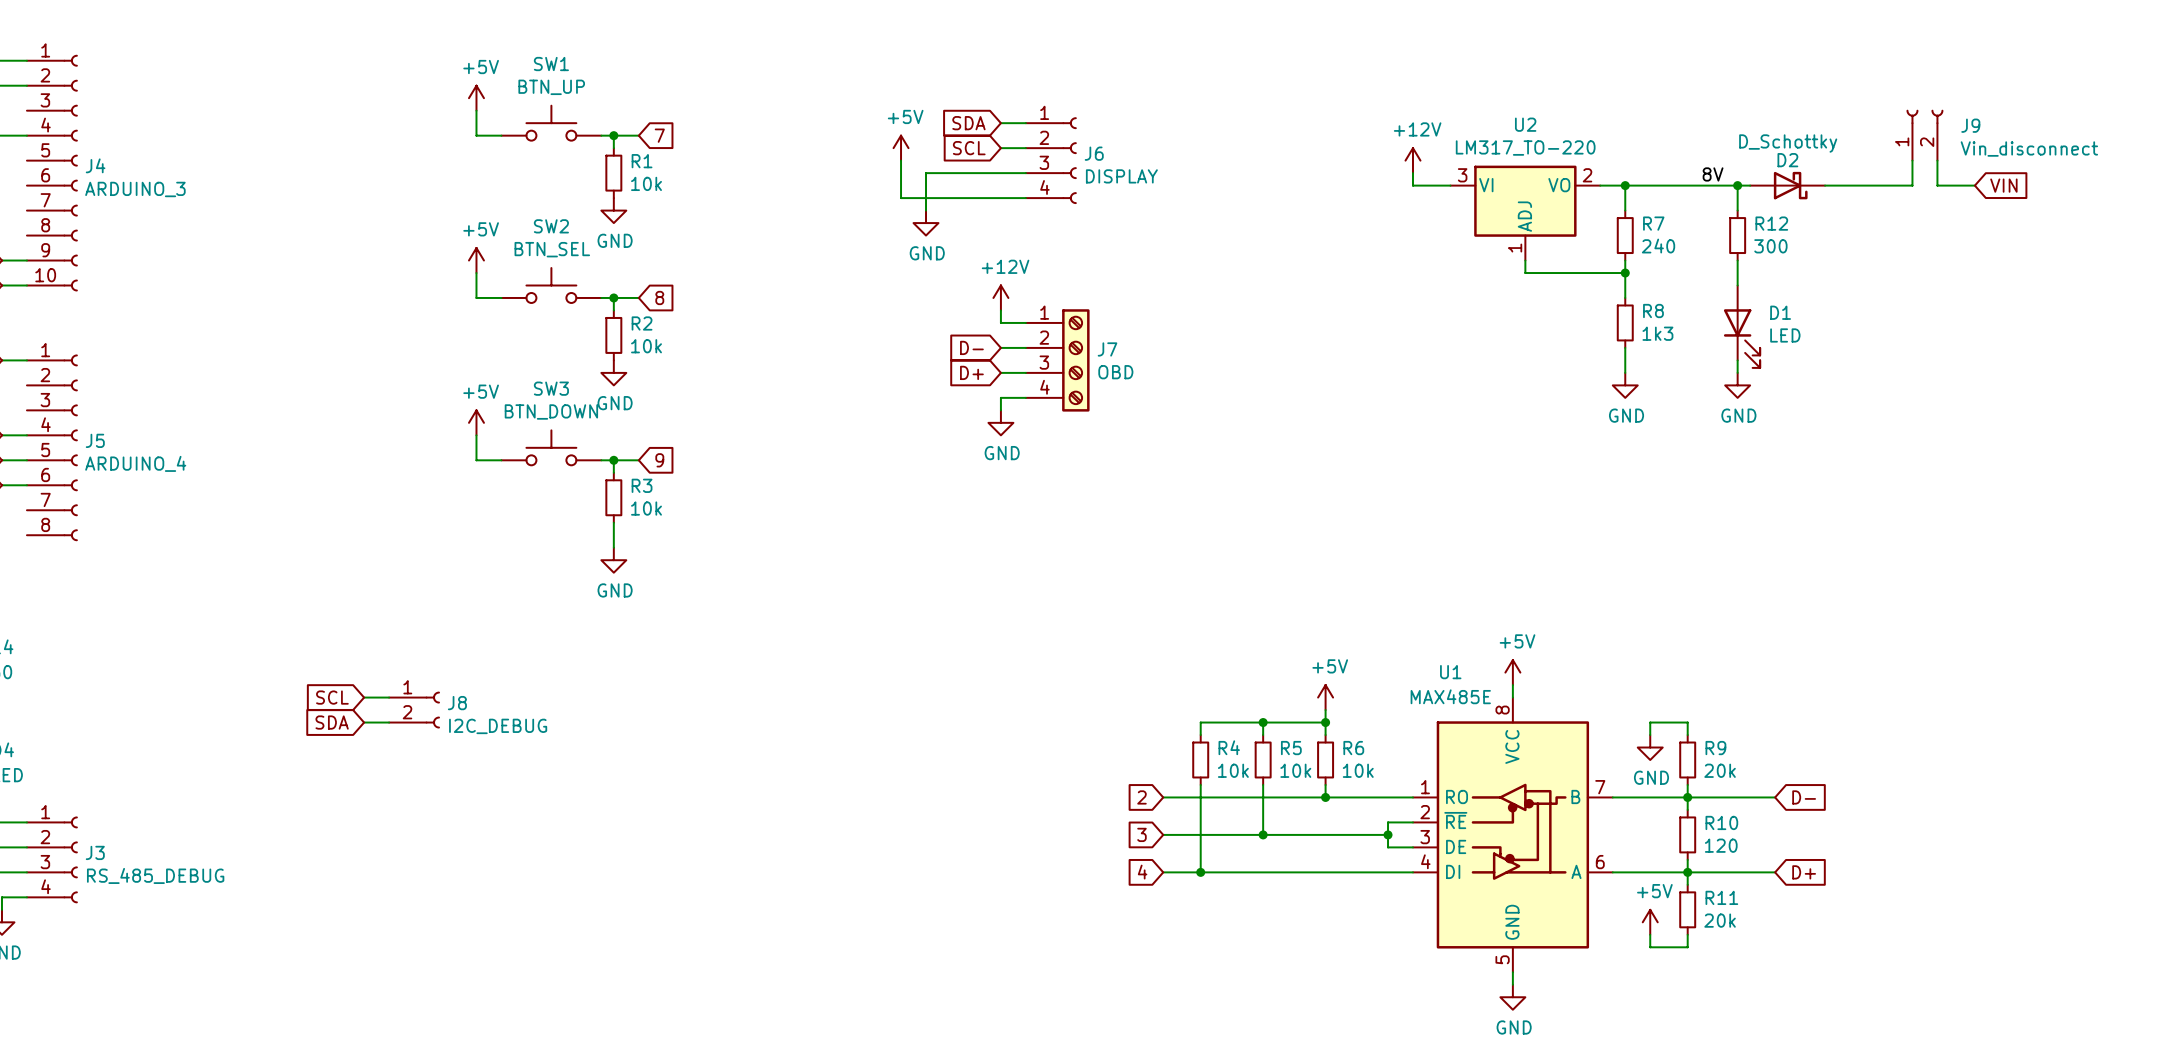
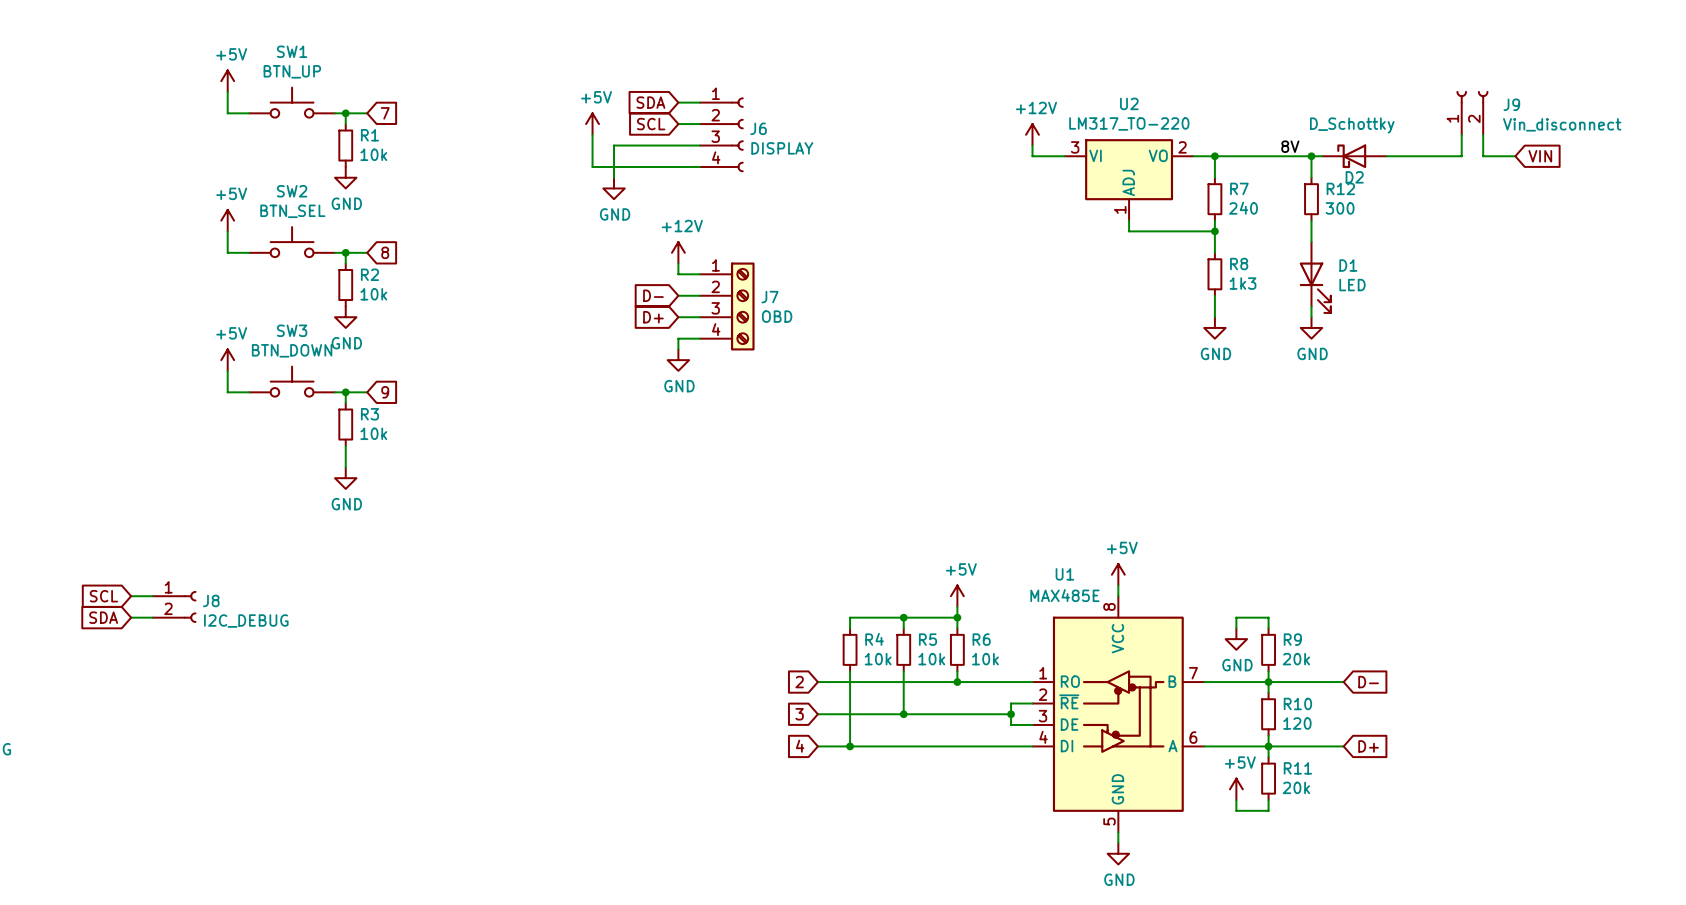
D2 rotation: 0° (1790, 185) -> 180° (1351, 156)

